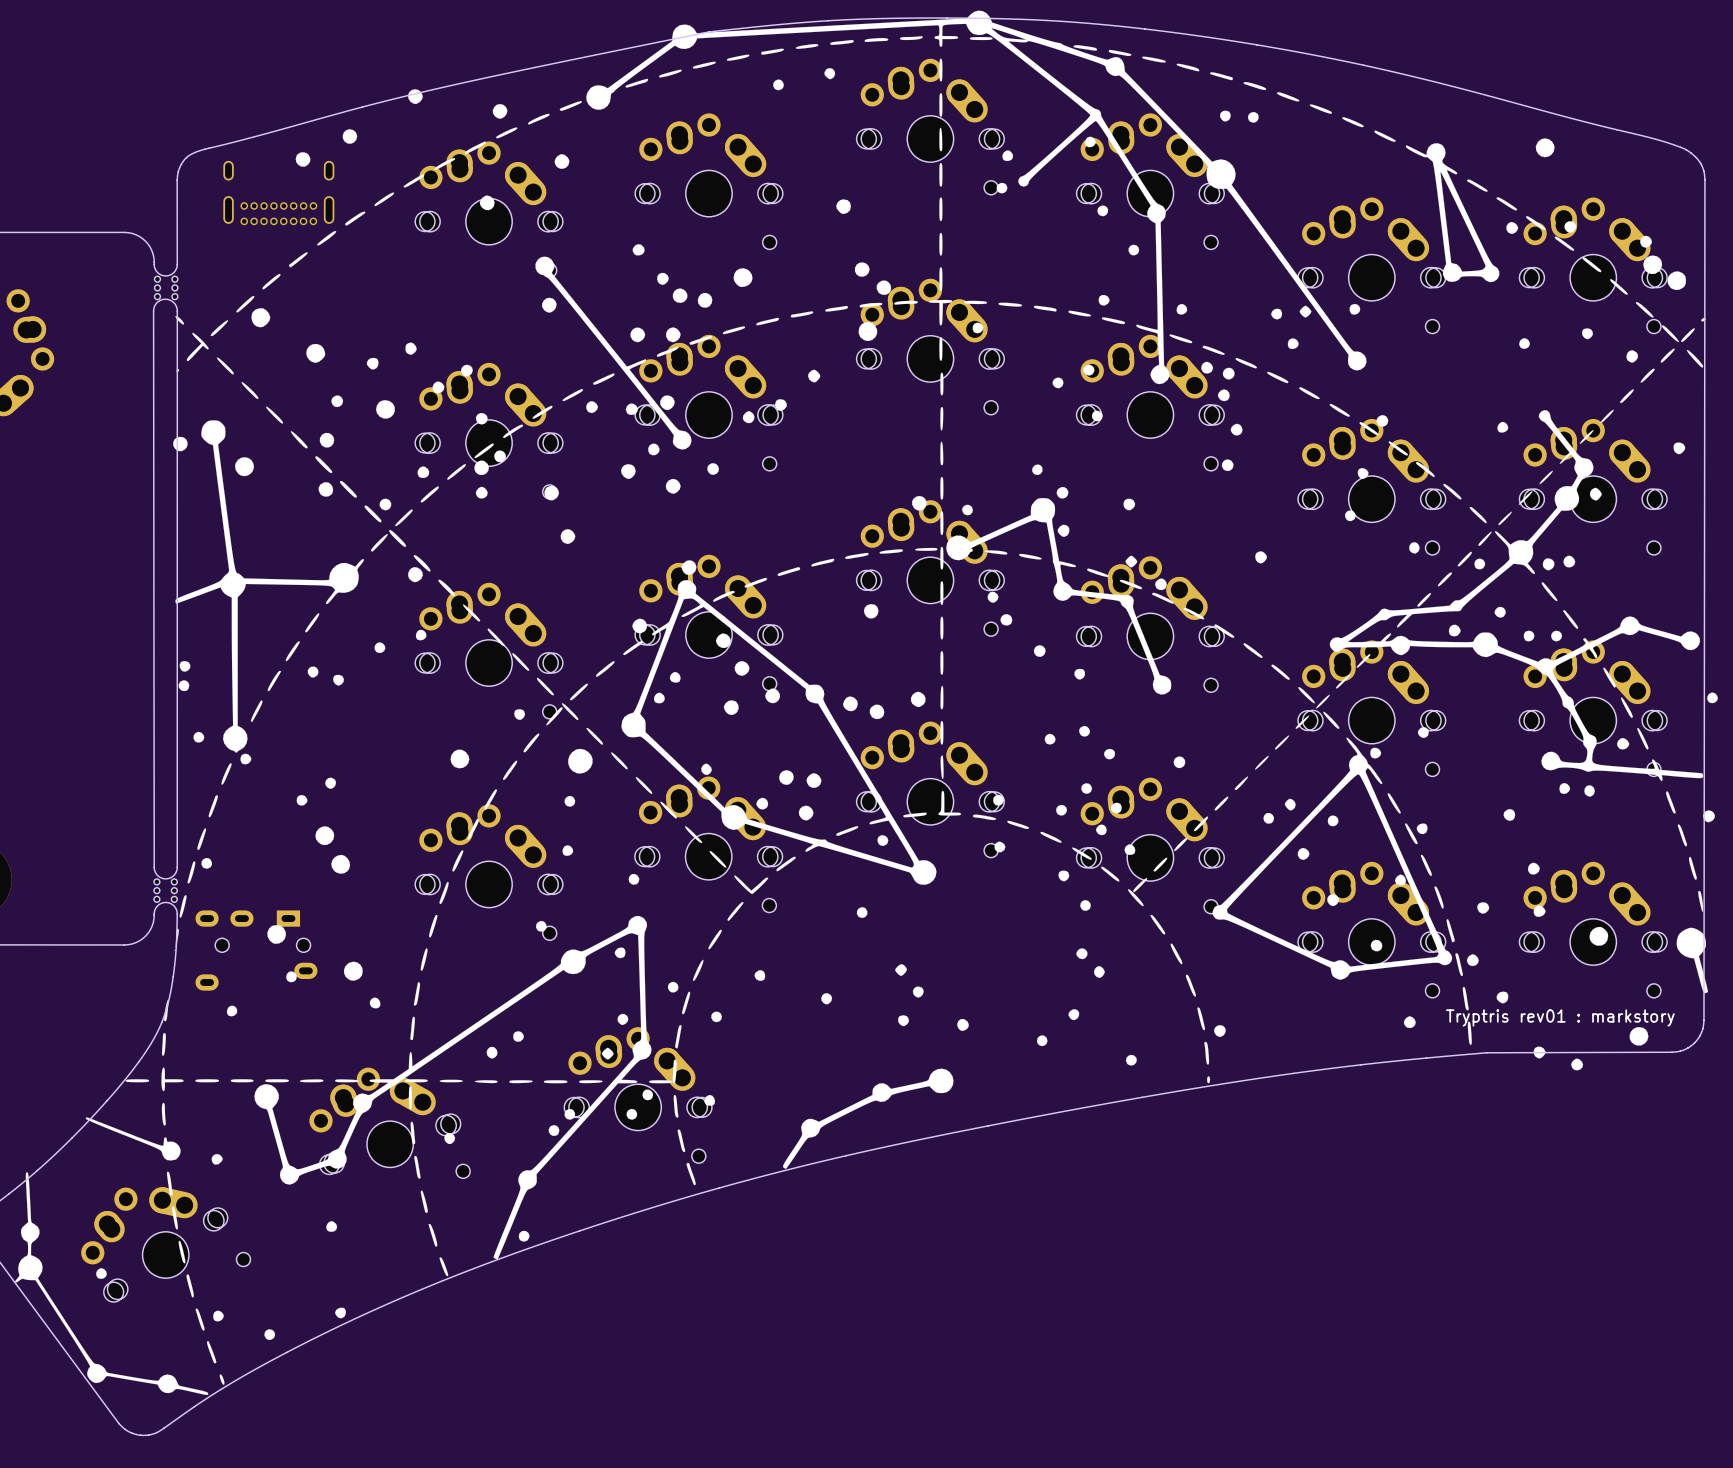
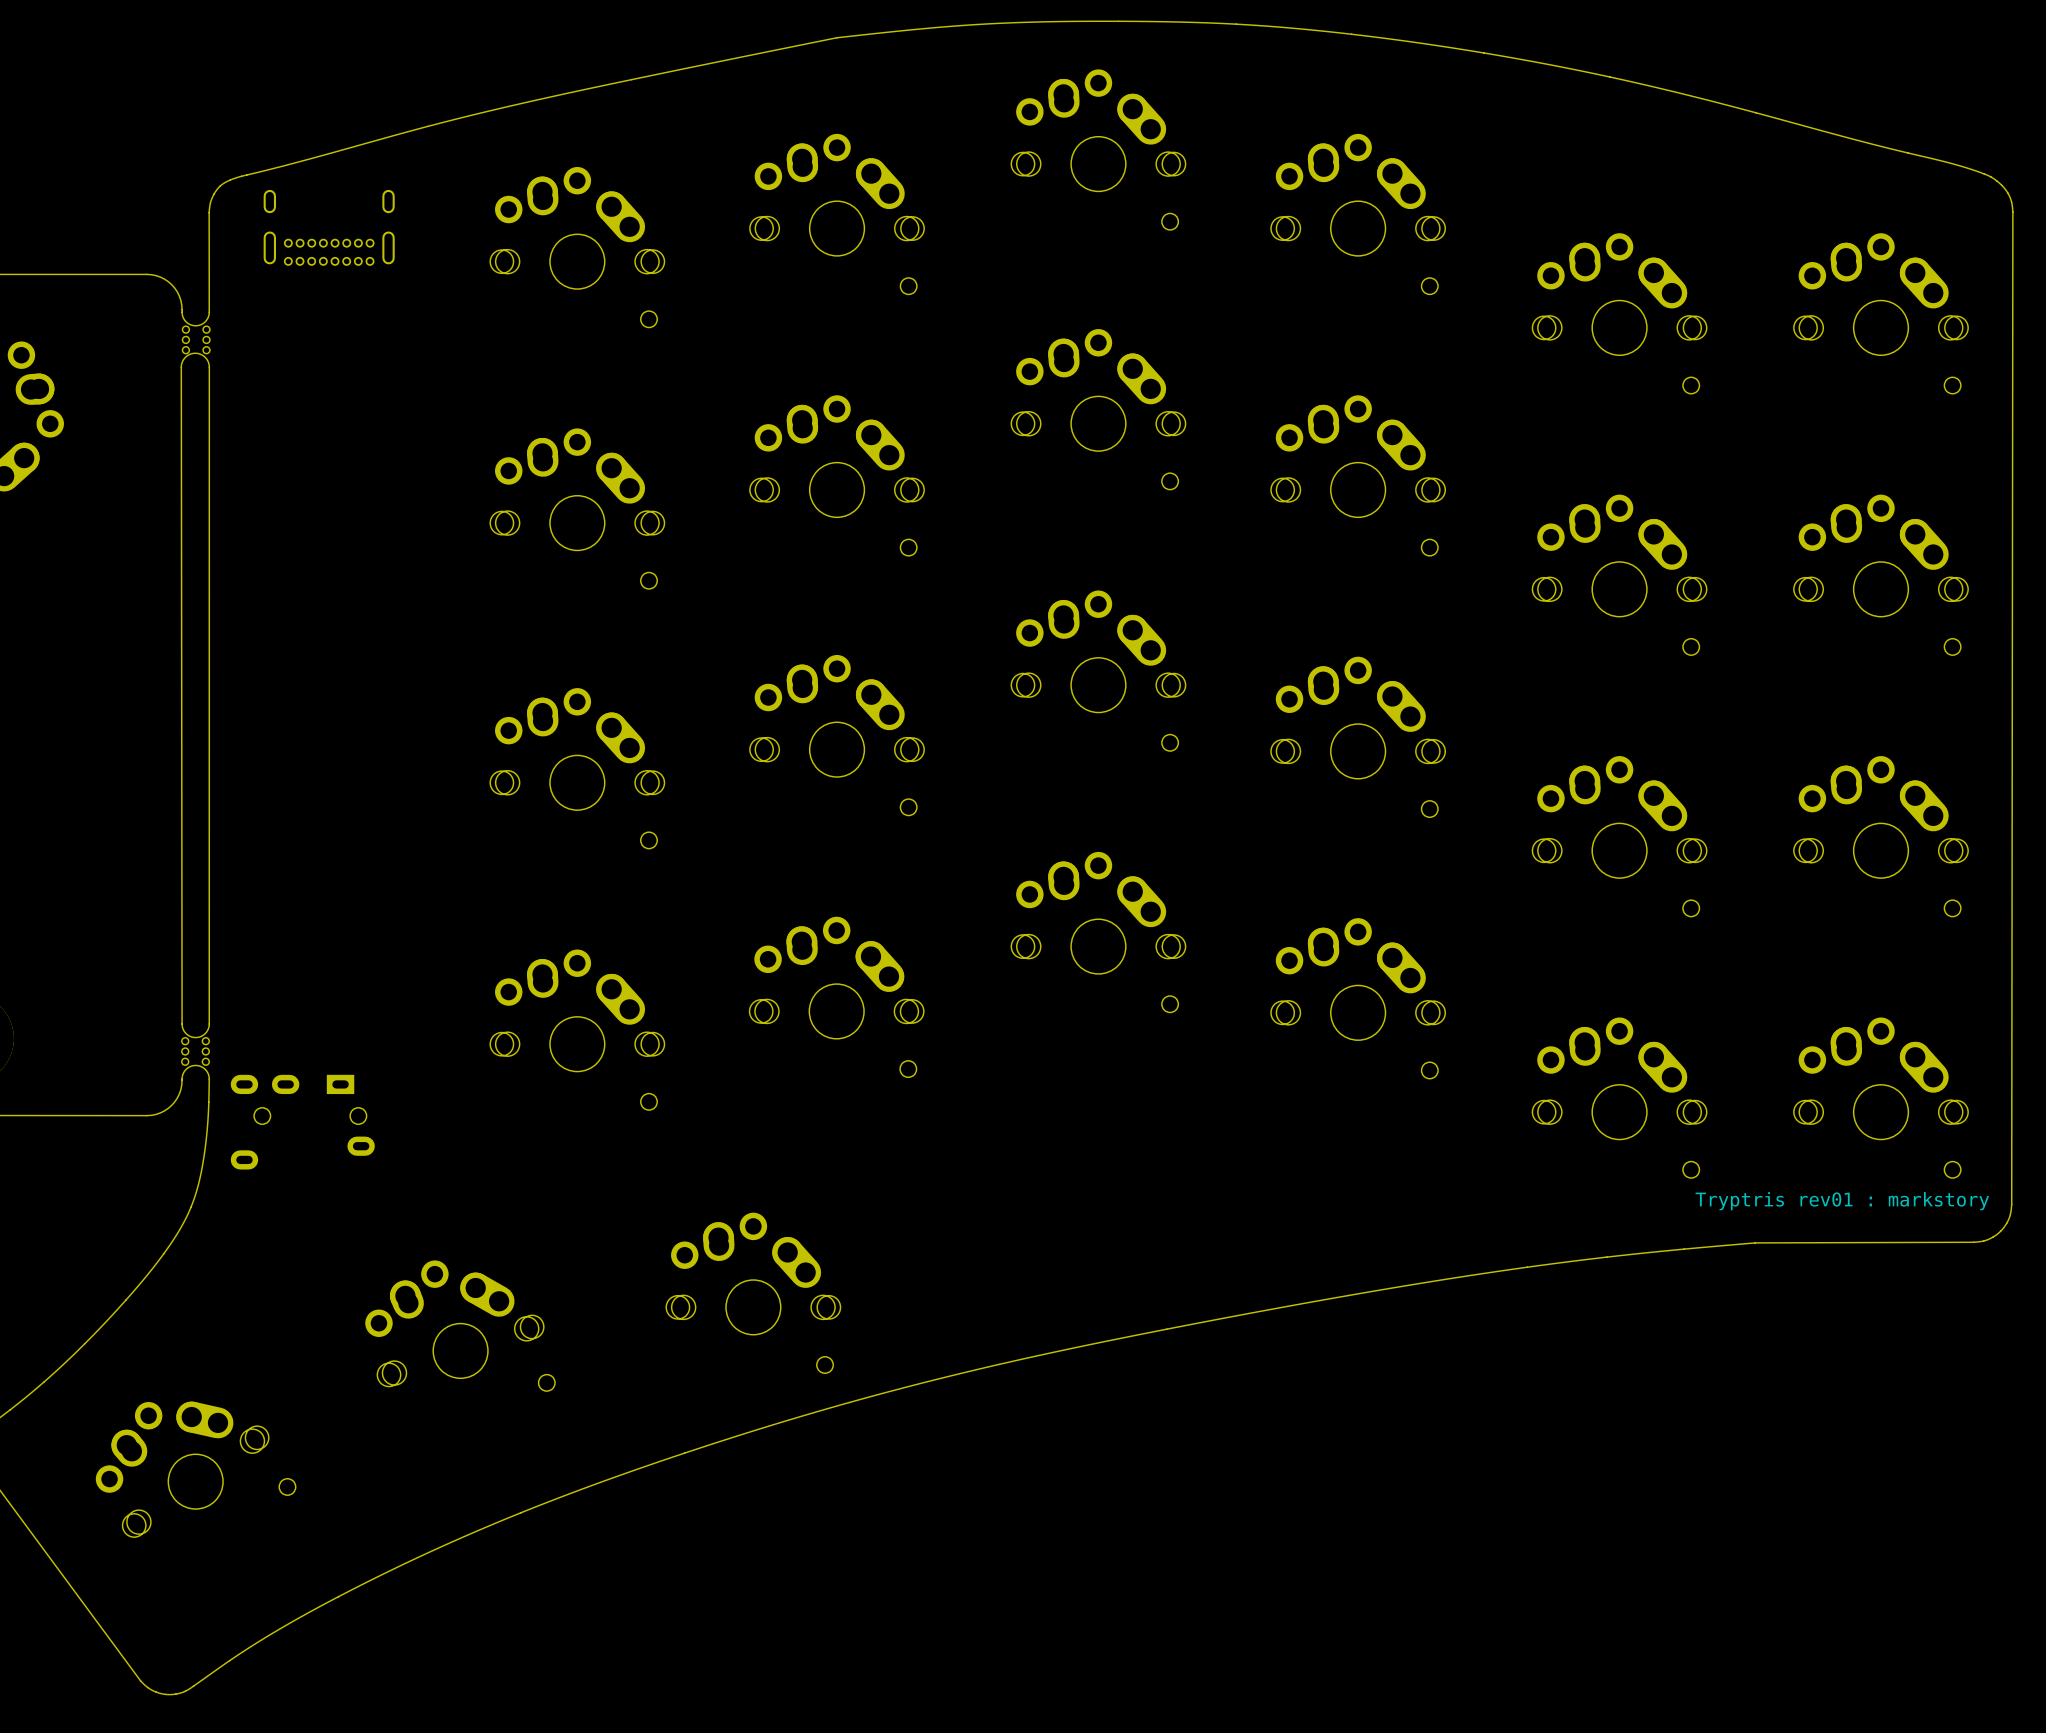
drawing: [15, 10, 1718, 1396] -> none

